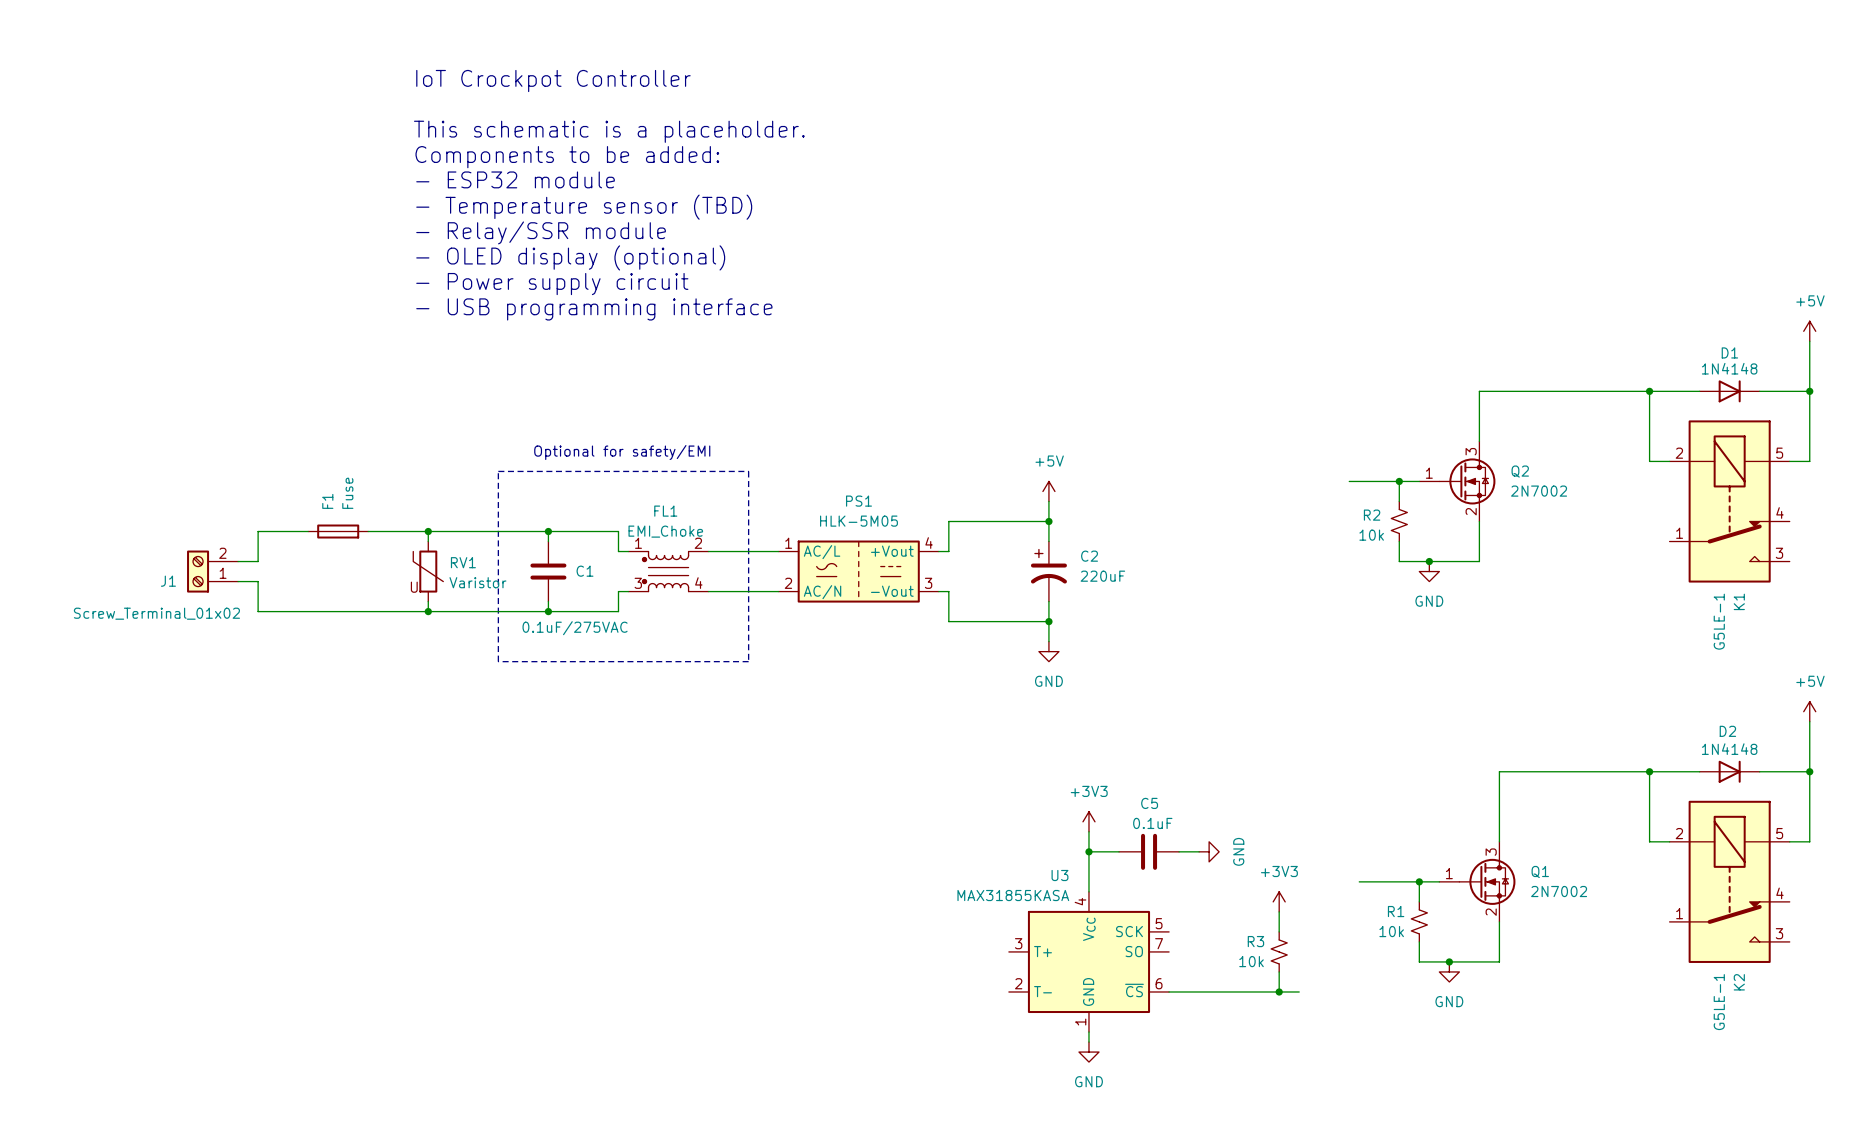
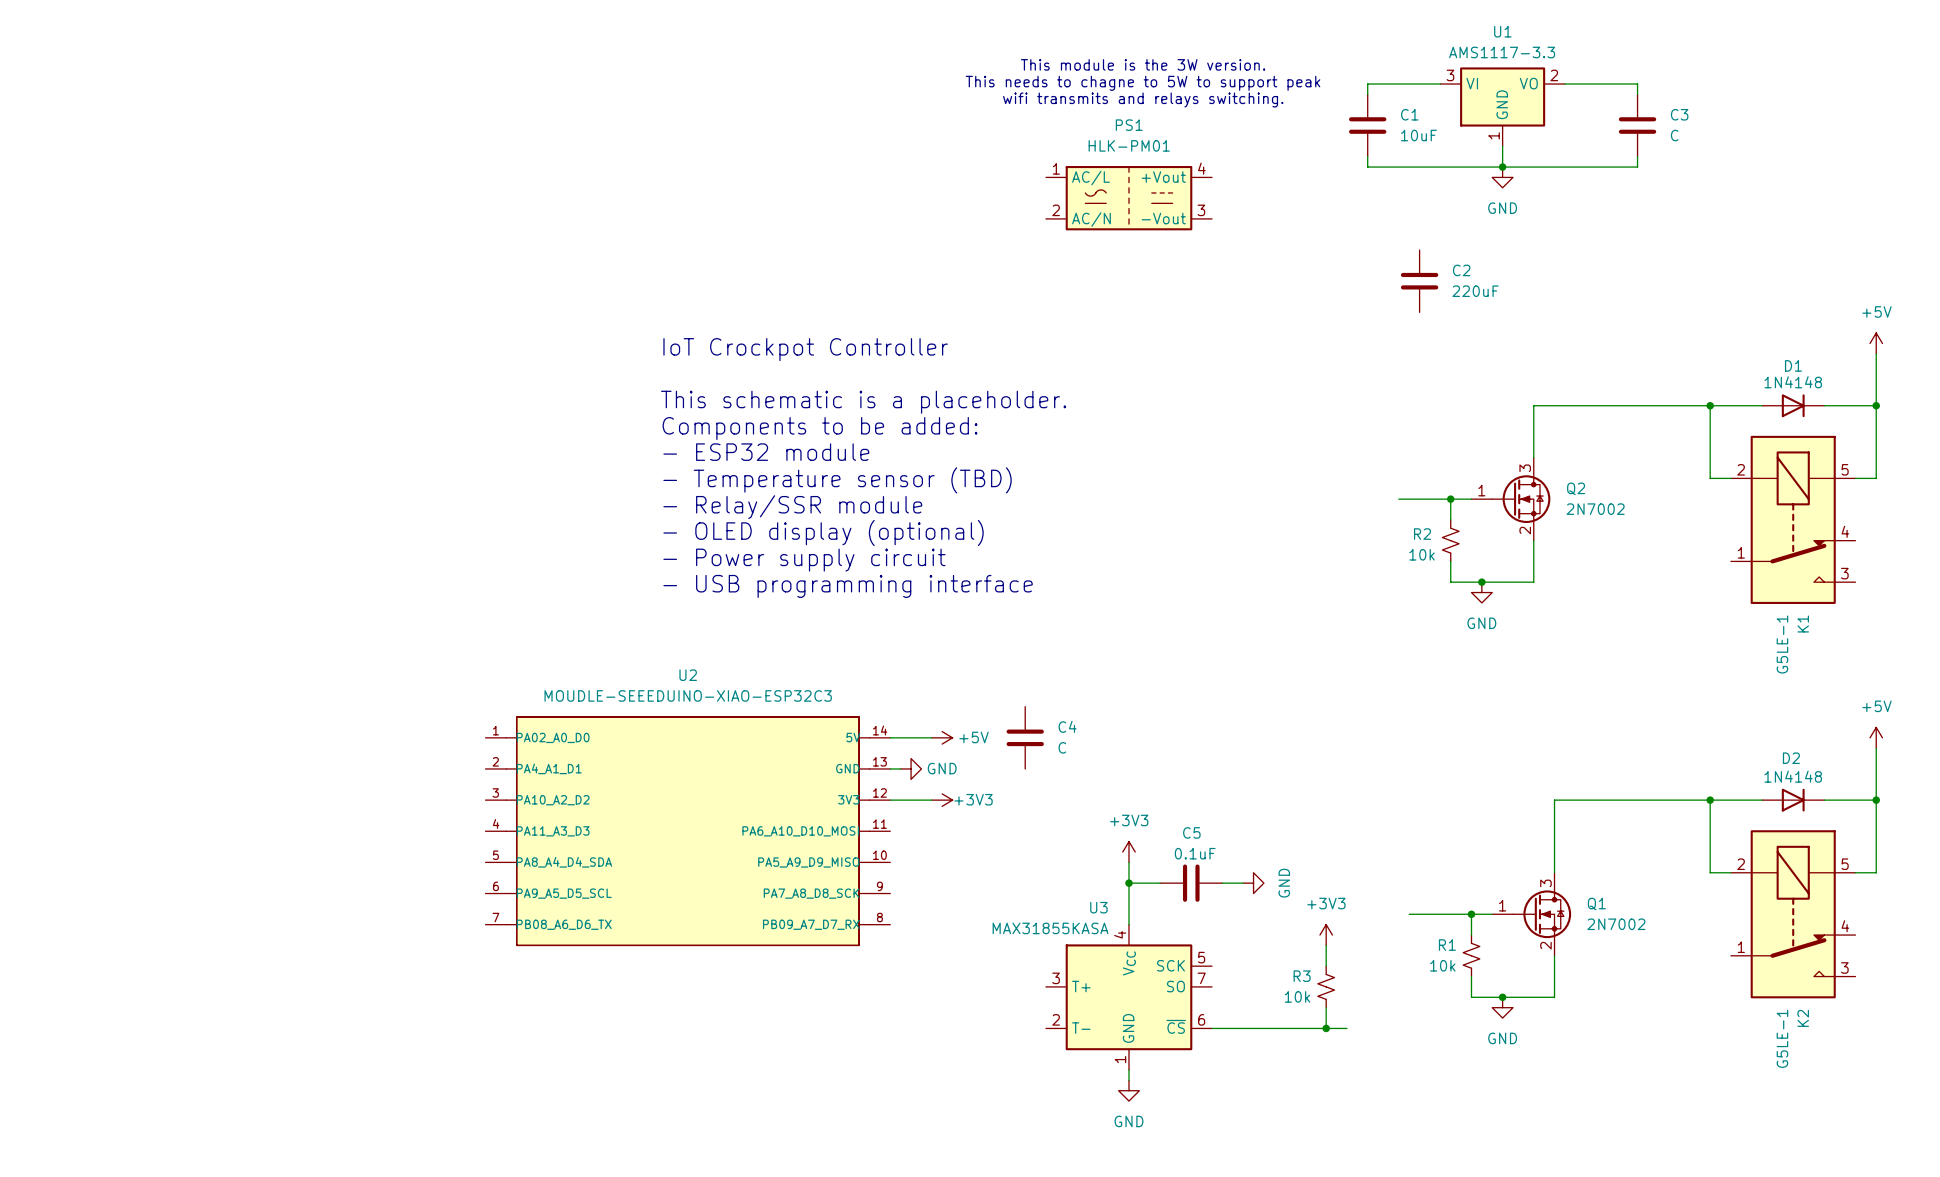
text: none -> This module is the 3W version. (1143, 64)
text: none -> This needs to chagne to 5W to support peak (1143, 83)
text: IoT Crockpot Controller (553, 81) -> none
wire: none -> (1440, 84) (1367, 84) (1367, 94)
wire: none -> (1564, 84) (1637, 84) (1637, 94)
text: none -> wifi transmits and relays switching. (1143, 100)
U1: none -> AMS1117-3.3 (1502, 106)
C3: none -> C (1637, 125)
text: This schematic is a placeholder. (609, 131) -> none
wire: none -> (1502, 146) (1502, 167)
wire: none -> (1367, 156) (1367, 167) (1637, 167) (1637, 156)
text: Components to be added: (567, 157) -> none
junction: none -> (1502, 167)
power symbol: none -> GND (1502, 177)
text: - ESP32 module (515, 179) -> none
text: - Temperature sensor (TBD) (584, 207) -> none
text: - Relay/SSR module (541, 232) -> none
text: - OLED display (optional) (570, 257) -> none
text: - Power supply circuit (552, 284) -> none
text: - USB programming interface (594, 309) -> none
text: none -> IoT Crockpot Controller (805, 349)
text: none -> This schematic is a placeholder. (863, 402)
text: none -> Components to be added: (820, 428)
text: none -> - ESP32 module (766, 452)
text: Optional for safety/EMI (622, 452) -> none
text: none -> - Temperature sensor (TBD) (837, 480)
line: (498, 471) (748, 471) (748, 661) (498, 661) (498, 471) -> none
text: none -> - Relay/SSR module (792, 507)
power symbol: +5V (1048, 491) -> none
wire: (1048, 501) (1048, 541) -> none
text: none -> - OLED display (optional) (823, 533)
PS1 value: HLK-5M05 (858, 521) -> HLK-PM01 (1129, 145)
wire: (1048, 521) (948, 521) (948, 551) (938, 551) -> none
junction: (1048, 521) -> none
wire: (308, 531) (258, 531) (258, 561) (238, 561) -> none
F1: Fuse (338, 531) -> none
wire: (368, 531) (618, 531) (618, 551) (628, 551) -> none
wire: (428, 531) (428, 541) -> none
junction: (428, 531) -> none
wire: (548, 531) (548, 541) -> none
junction: (548, 531) -> none
text: none -> - Power supply circuit (804, 560)
C2 symbol: [1030, 541, 1067, 602] -> [1400, 250, 1439, 313]
wire: (708, 551) (778, 551) -> none
text: none -> - USB programming interface (848, 586)
J1: Screw_Terminal_01x02 (212, 571) -> none
RV1: Varistor (428, 571) -> none
C1 position: (548, 571) -> (1367, 125)
C1 name position: C1 (585, 571) -> C1 (1409, 114)
FL1: EMI_Choke (668, 571) -> none
PS1 position: (858, 571) -> (1129, 198)
wire: (238, 581) (258, 581) (258, 611) (618, 611) (618, 591) (628, 591) -> none
wire: (708, 591) (778, 591) -> none
wire: (938, 591) (948, 591) (948, 621) (1048, 621) -> none
wire: (428, 601) (428, 611) -> none
wire: (548, 601) (548, 611) -> none
wire: (1048, 601) (1048, 641) -> none
junction: (428, 611) -> none
junction: (548, 611) -> none
junction: (1048, 621) -> none
C1 value: 0.1uF/275VAC (575, 628) -> 10uF (1418, 135)
power symbol rotation: 0° (1048, 651) -> 90° counterclockwise (911, 768)
power symbol position: GND (1048, 651) -> GND (911, 768)
wire: none -> (890, 737) (931, 737)
power symbol: none -> +5V (942, 737)
C4: none -> C (1025, 737)
wire: none -> (890, 768) (900, 768)
wire: none -> (890, 800) (931, 800)
power symbol: none -> +3V3 (942, 800)
U2: none -> MOUDLE-SEEEDUINO-XIAO-ESP32C3 (687, 831)

